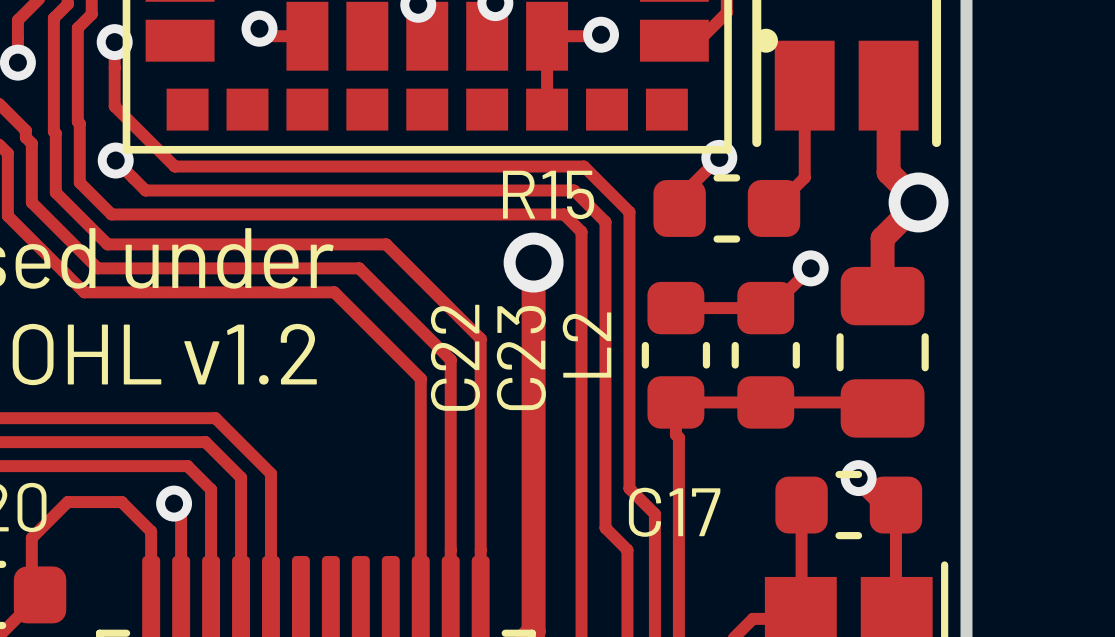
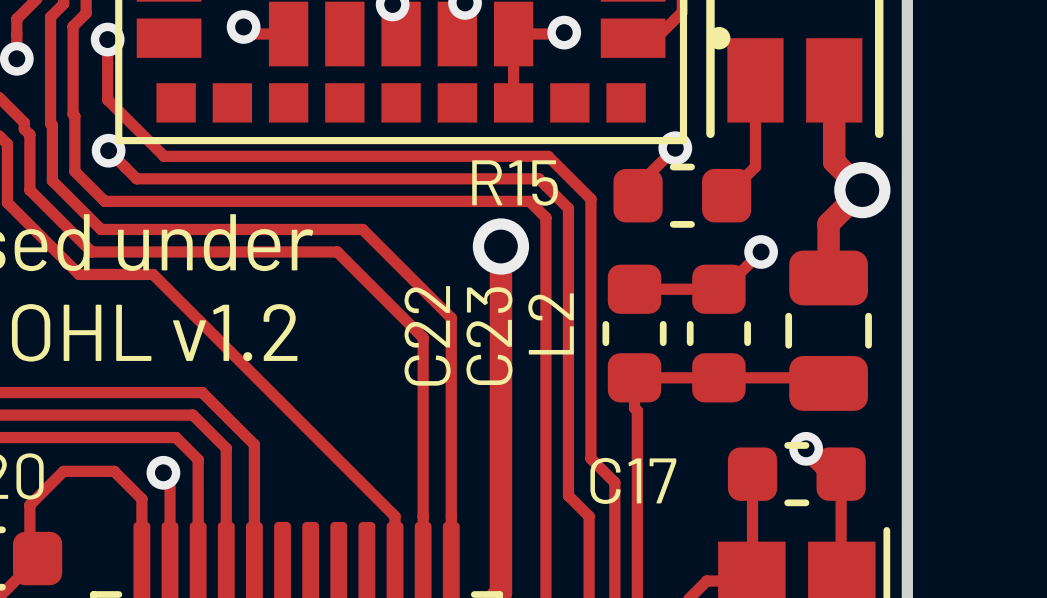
track: (163, 292) (334, 292) (420, 378) (420, 549) -> (153, 274) (395, 516)

